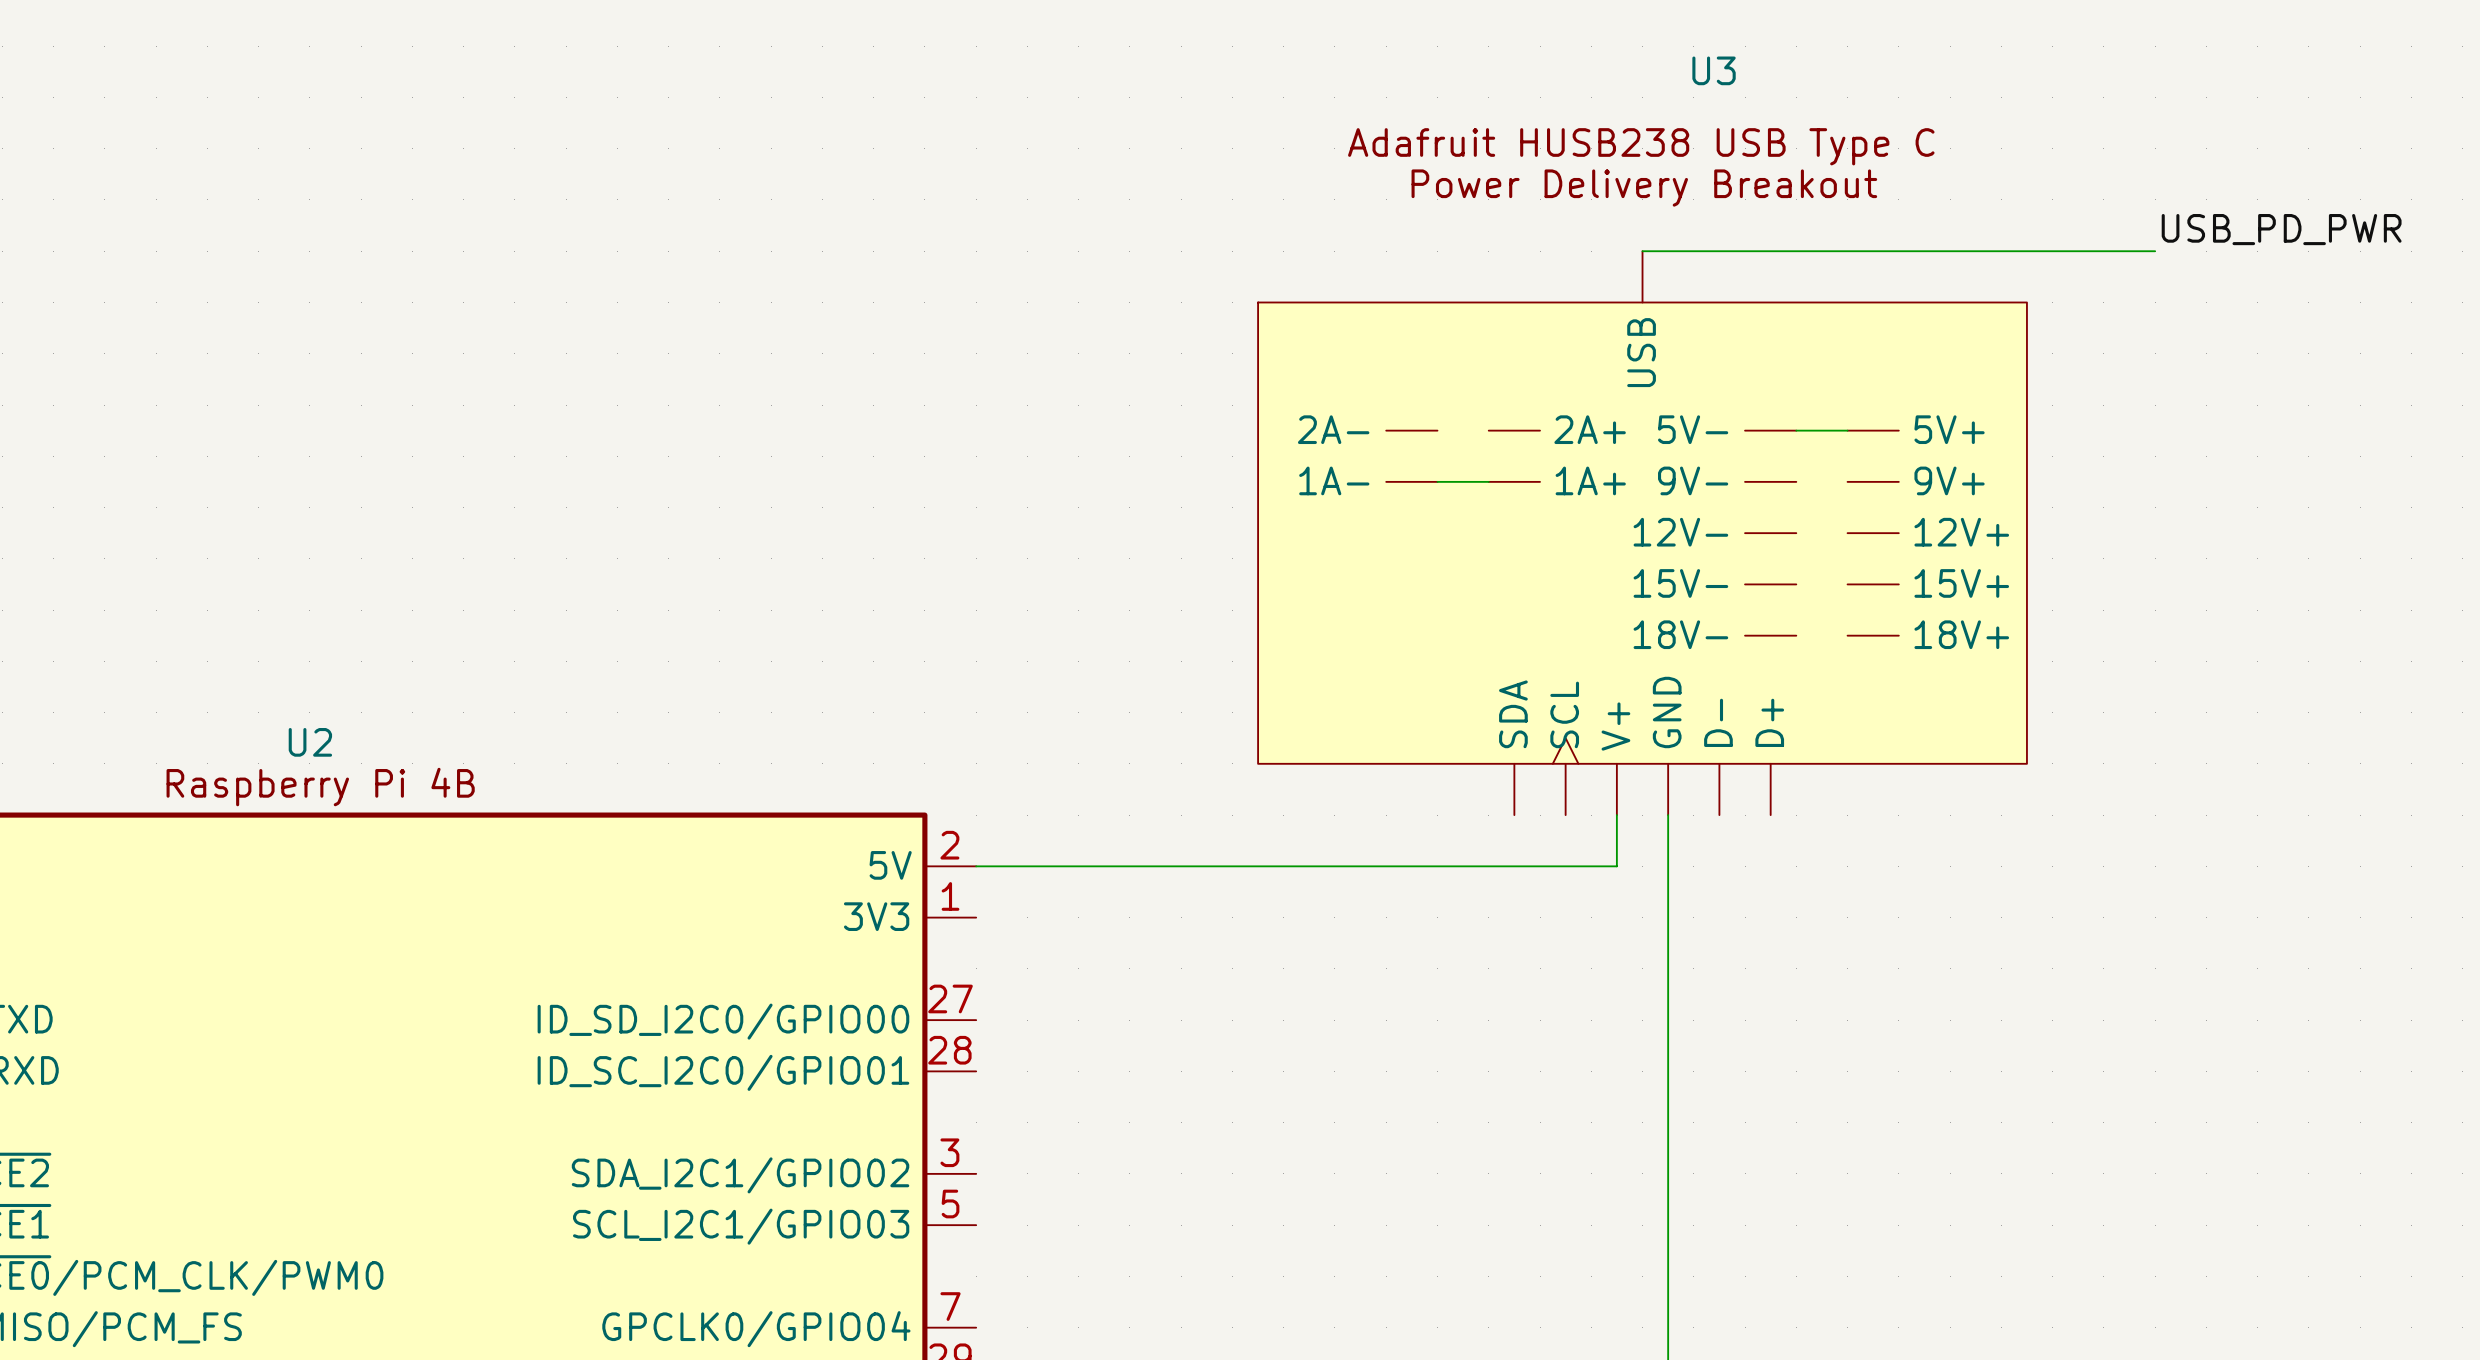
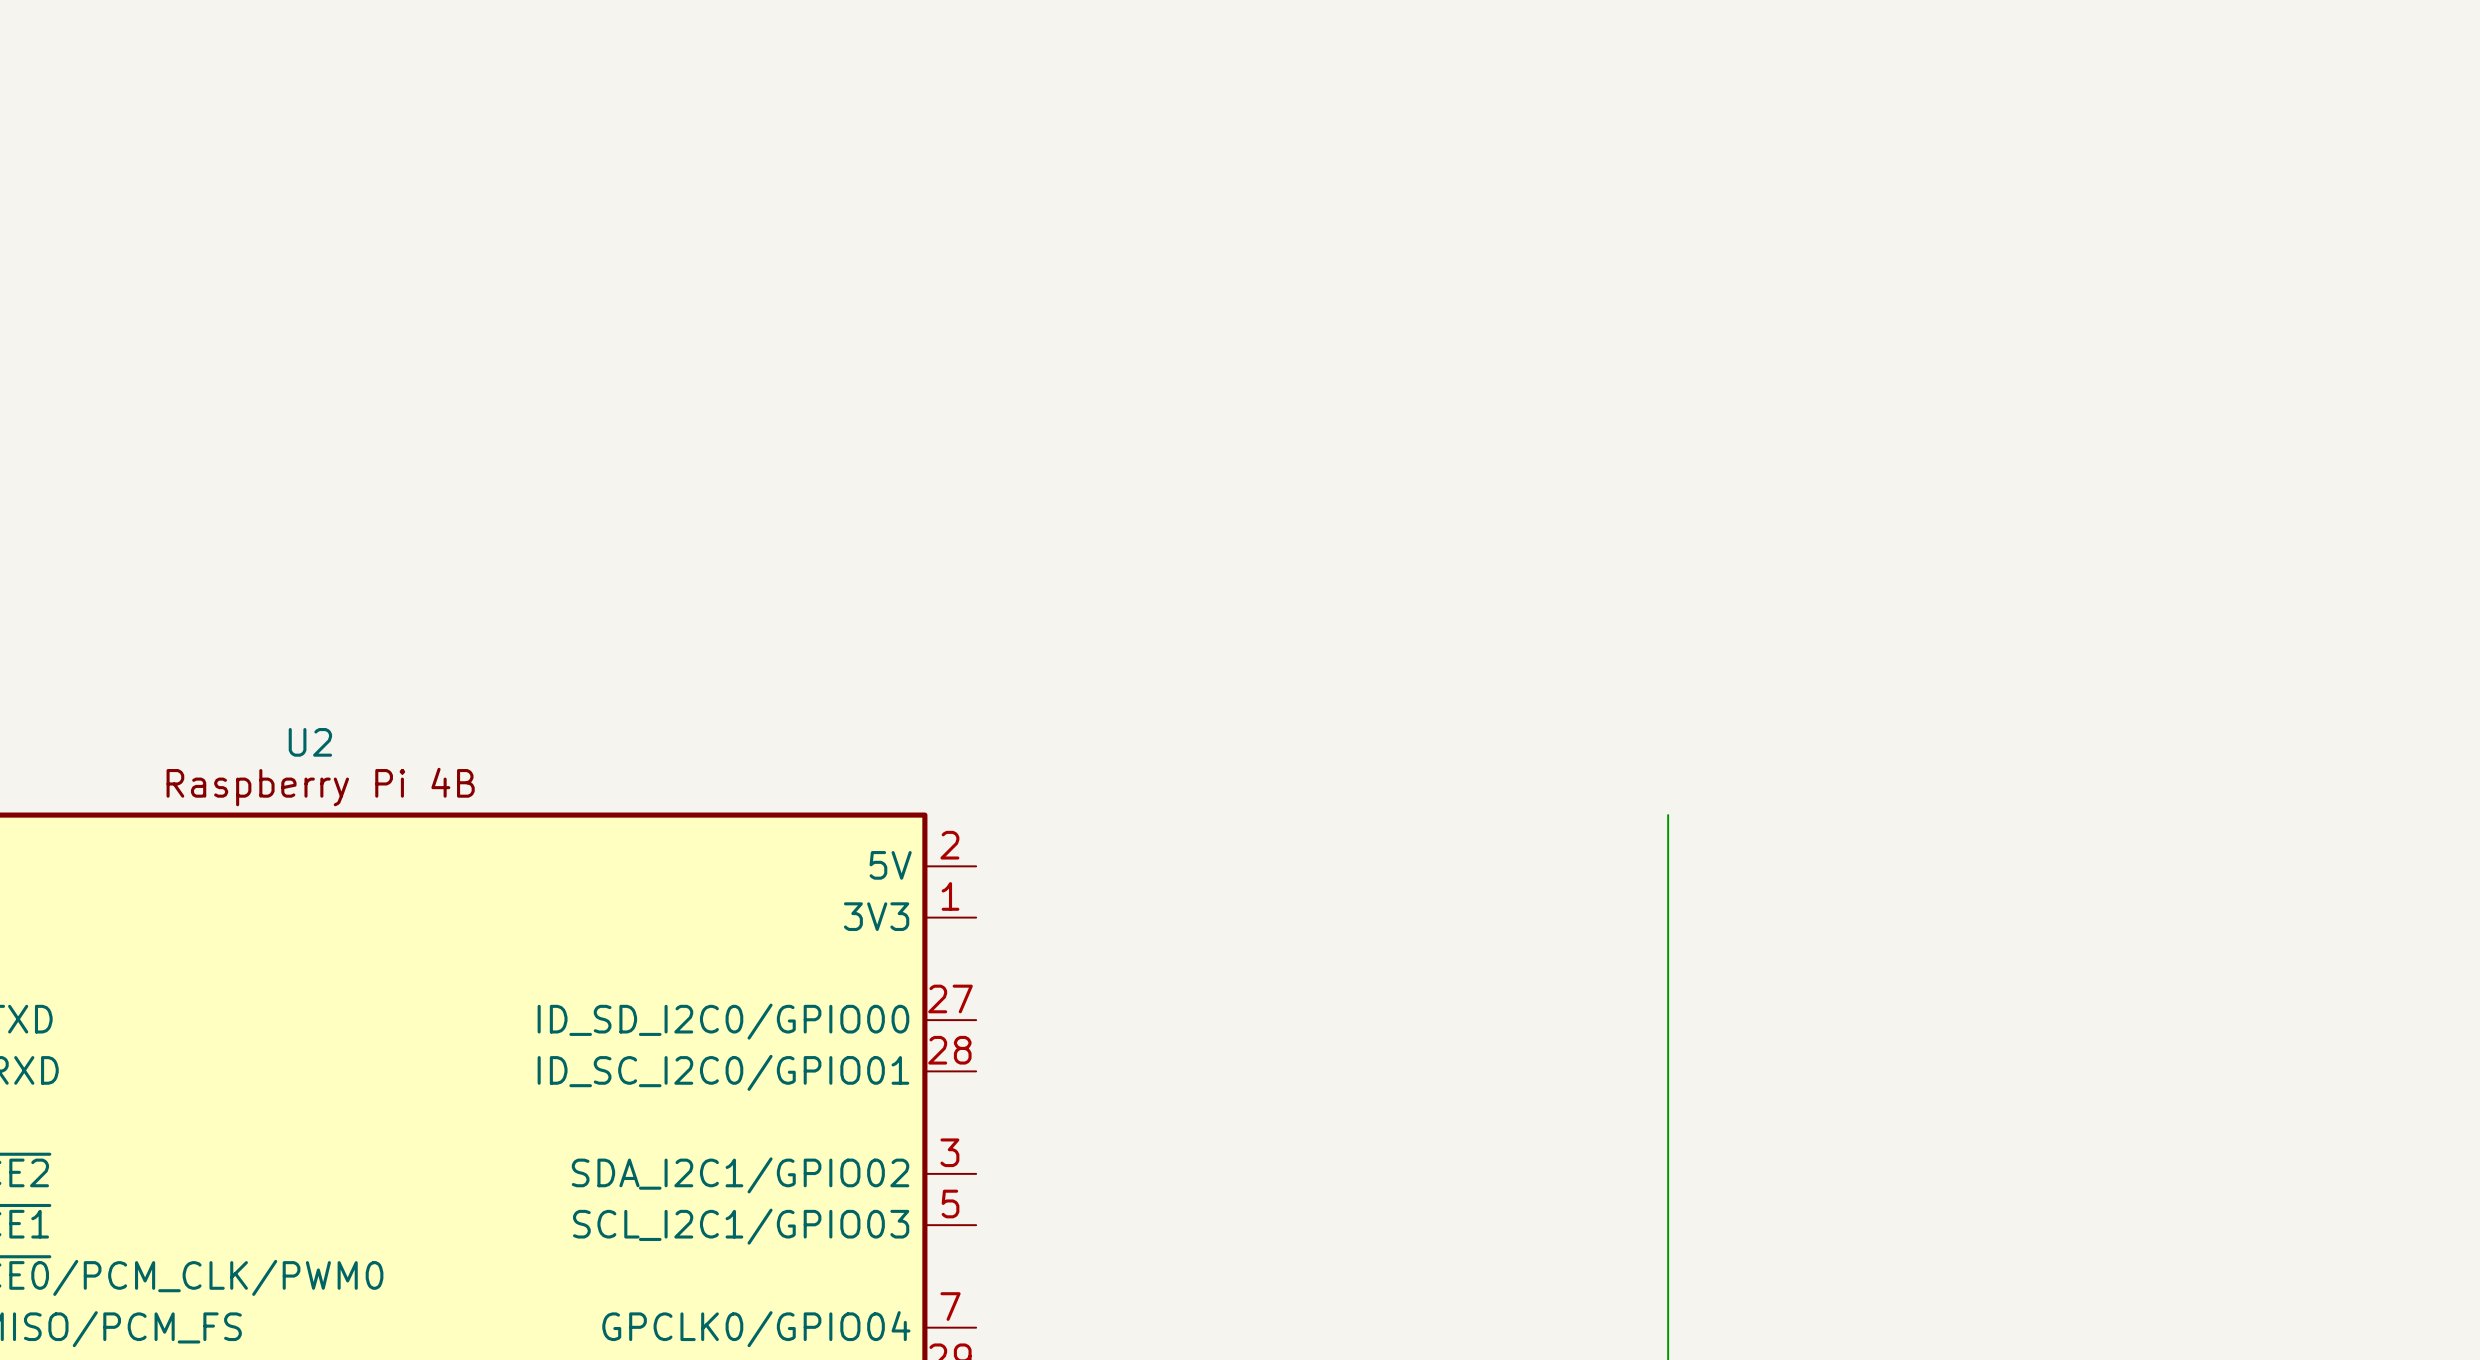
label: USB_PD_PWR (2281, 229) -> none
wire: (1642, 251) (2155, 251) -> none
wire: (1796, 430) (1847, 430) -> none
wire: (1437, 481) (1488, 481) -> none
U3: (1642, 533) -> none
wire: (1616, 815) (1616, 866) (976, 866) -> none

